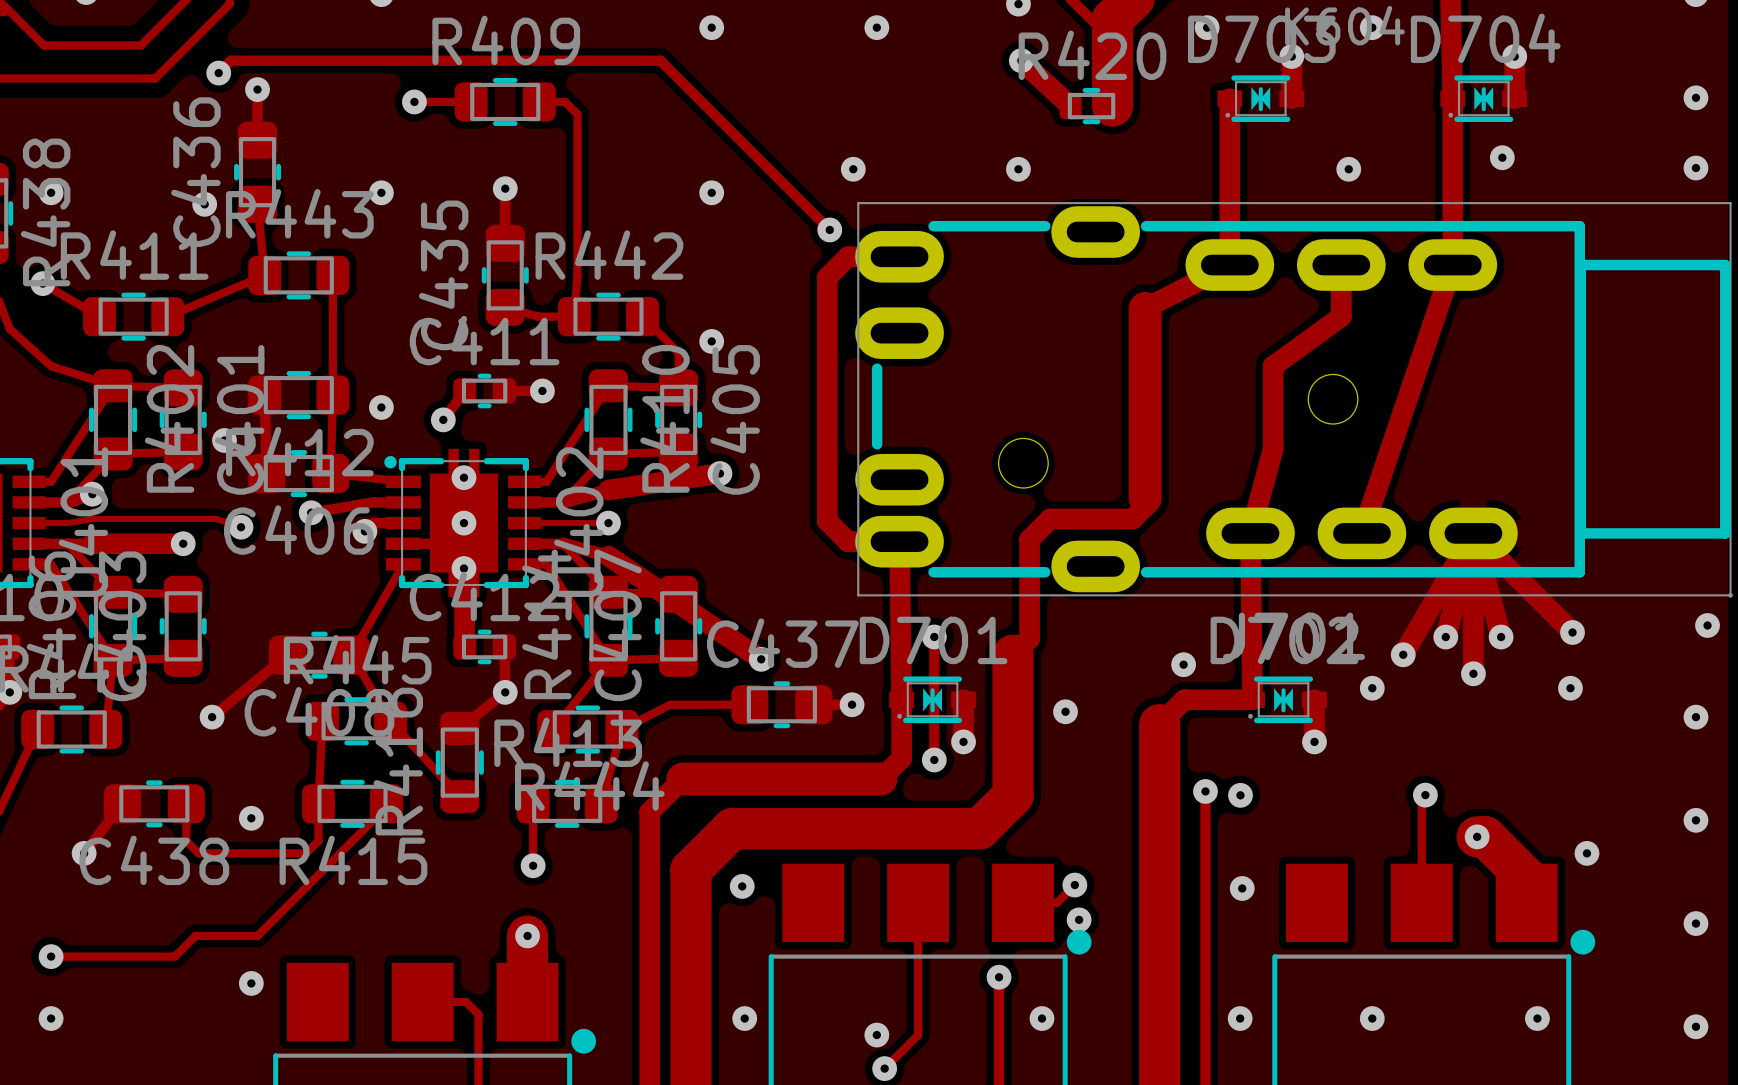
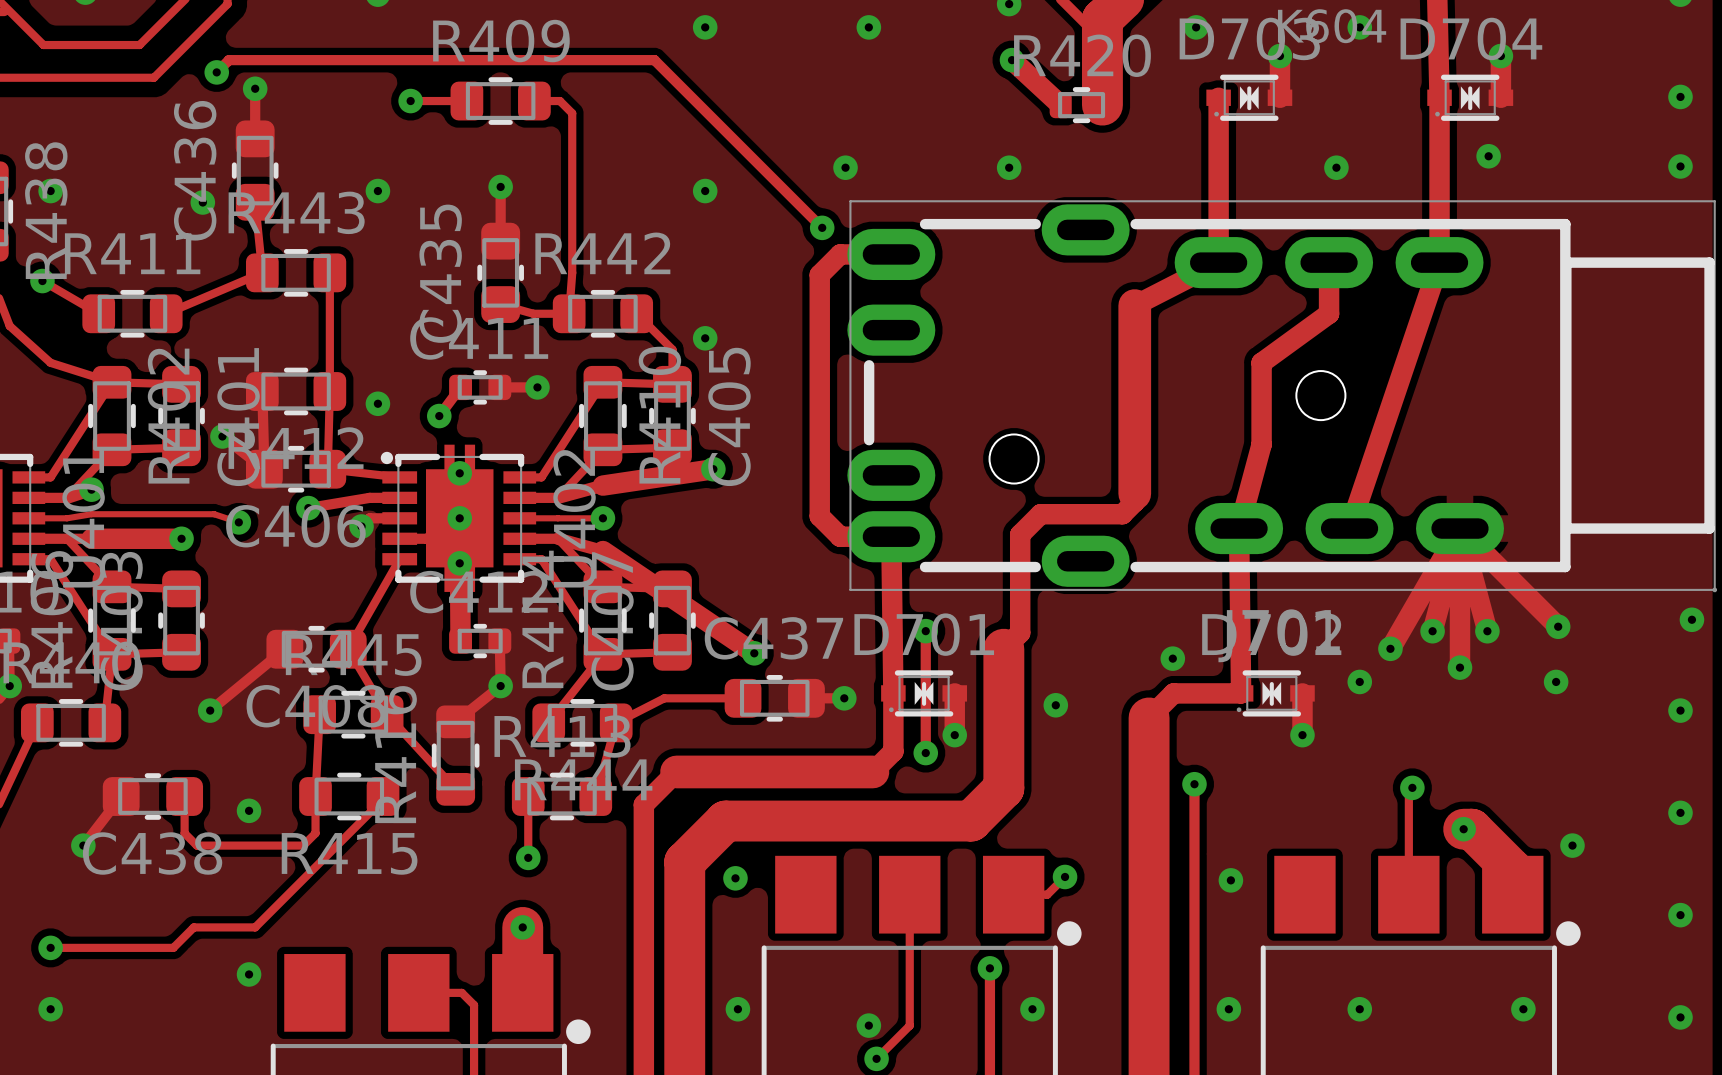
via: (1240, 795) -> none
via: (1079, 919) -> none

